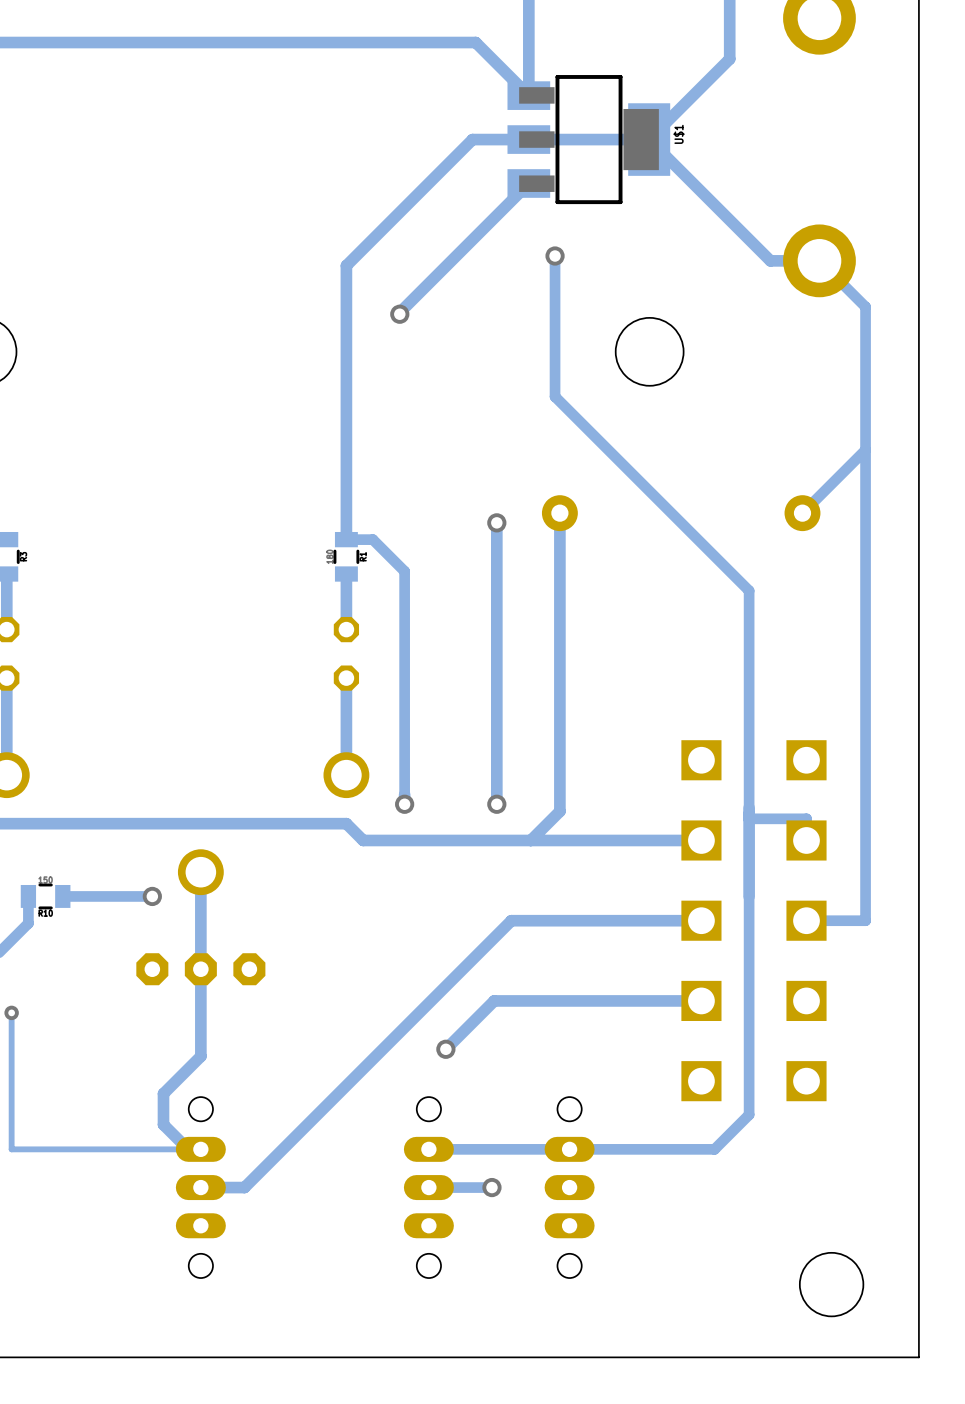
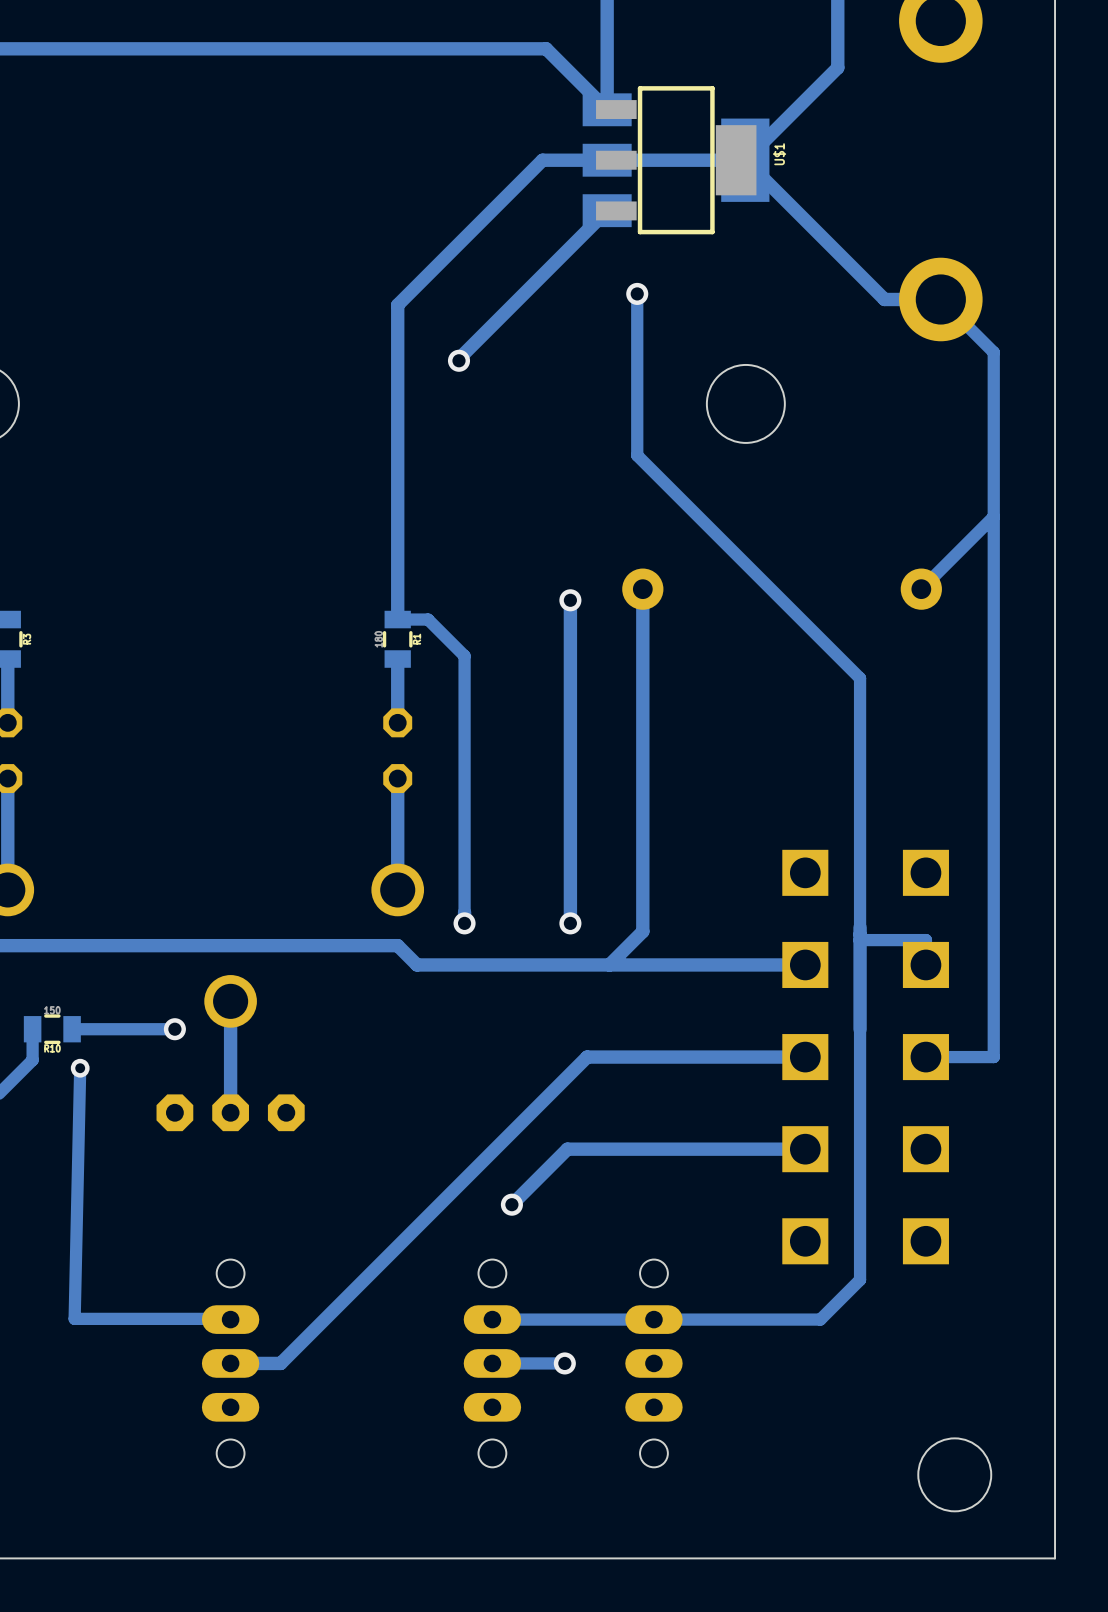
via: none -> (80, 1068)
track: (200, 969) (200, 1056) (163, 1093) (163, 1124) (185, 1146) (198, 1146) -> none
track: (11, 1012) (11, 1149) (200, 1149) -> (80, 1068) (74, 1318) (230, 1319)
via: (11, 1012) -> none

